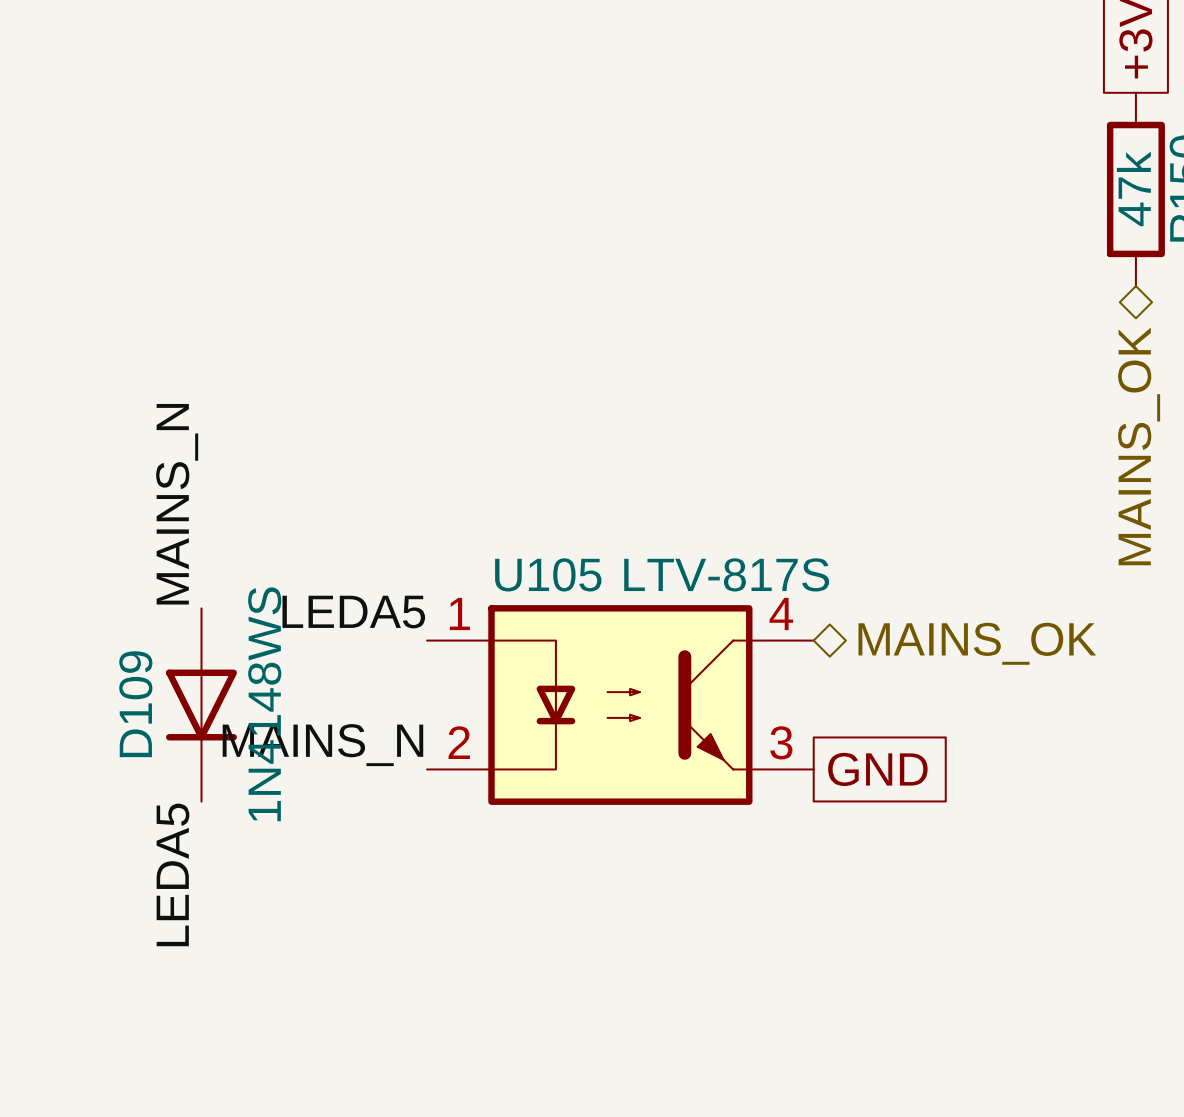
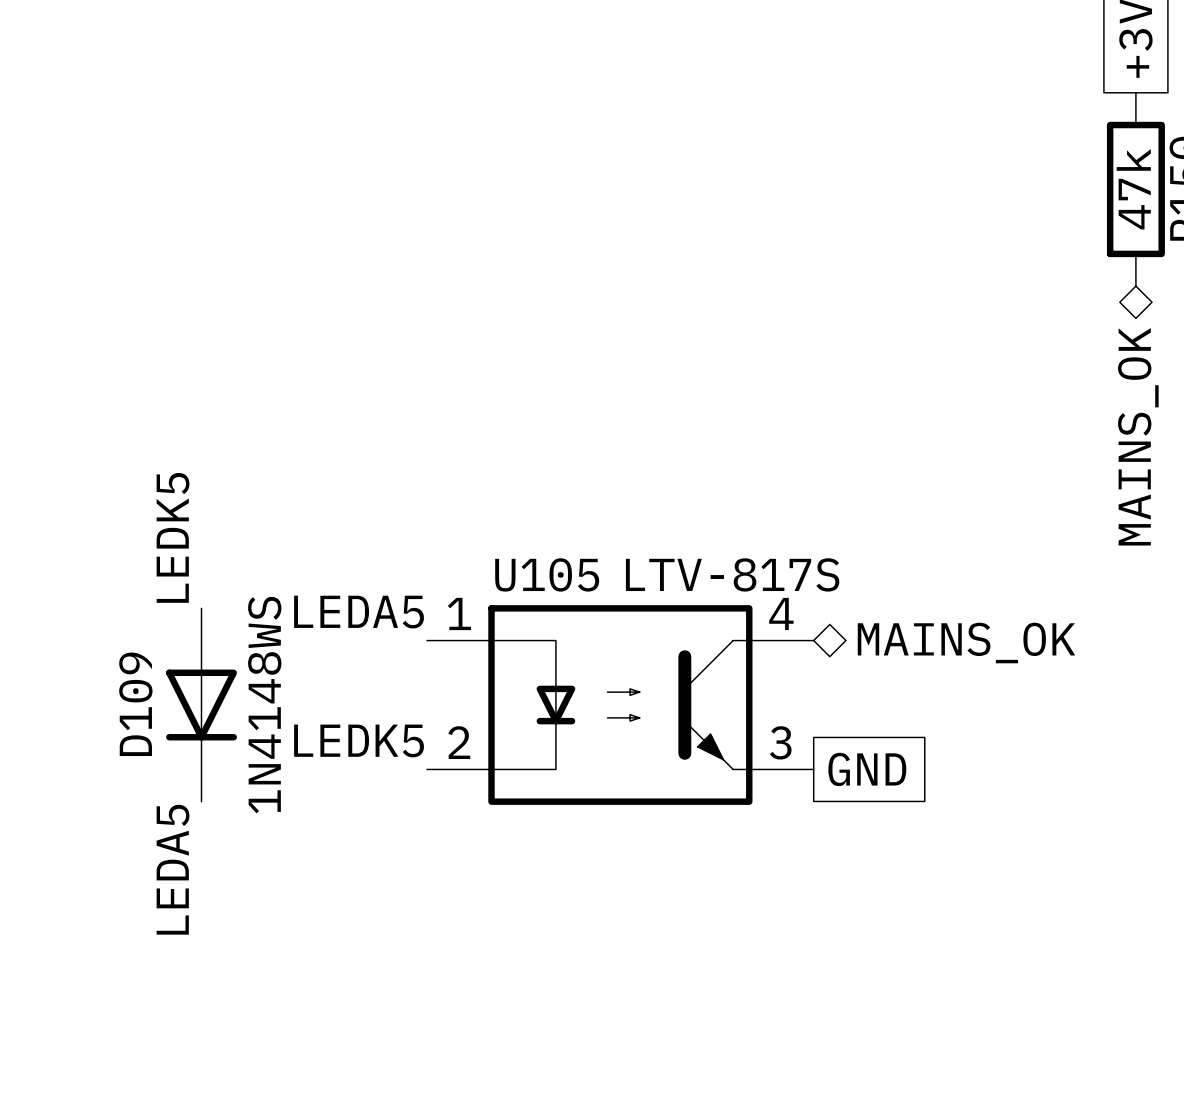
label: MAINS_N (177, 504) -> LEDK5 (173, 537)
label: MAINS_N (322, 745) -> LEDK5 (359, 740)

